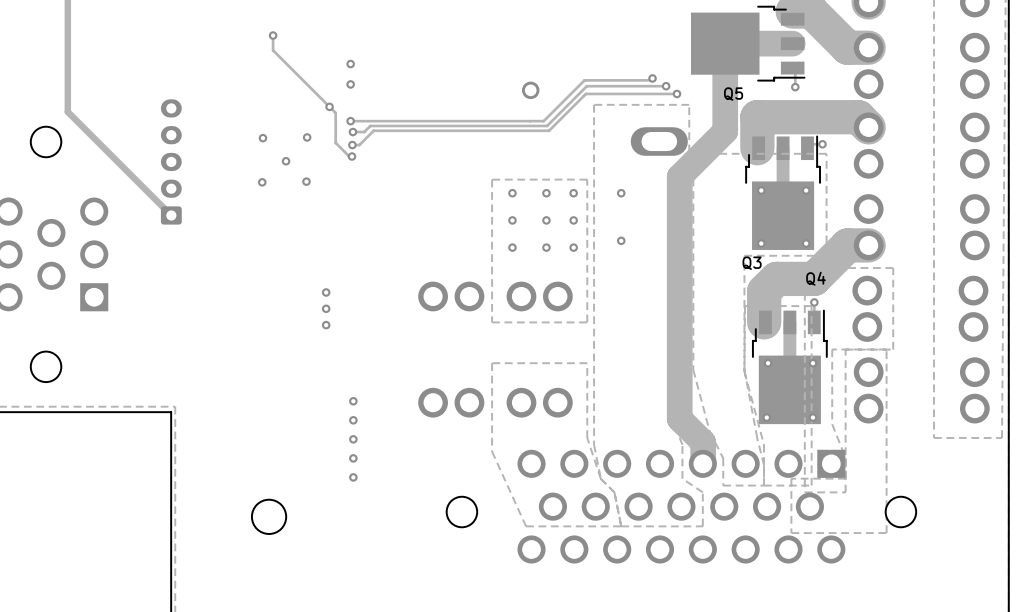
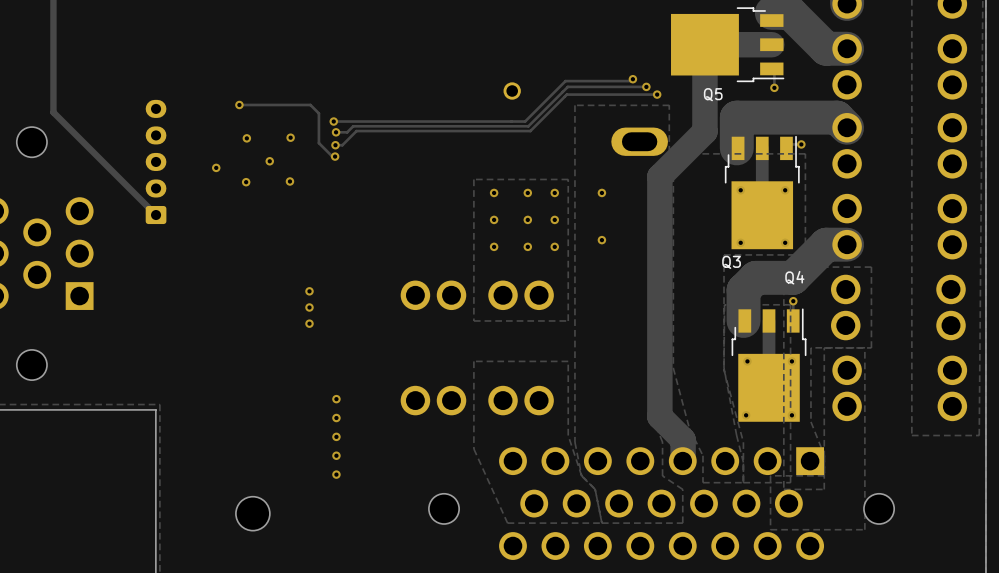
track: (273, 35) (273, 50) (327, 104) -> (239, 104) (310, 104)
via: (273, 35) -> none
via: (350, 64) -> none
via: (350, 84) -> none
via: none -> (239, 104)
via: (329, 106) -> none
via: none -> (216, 167)

